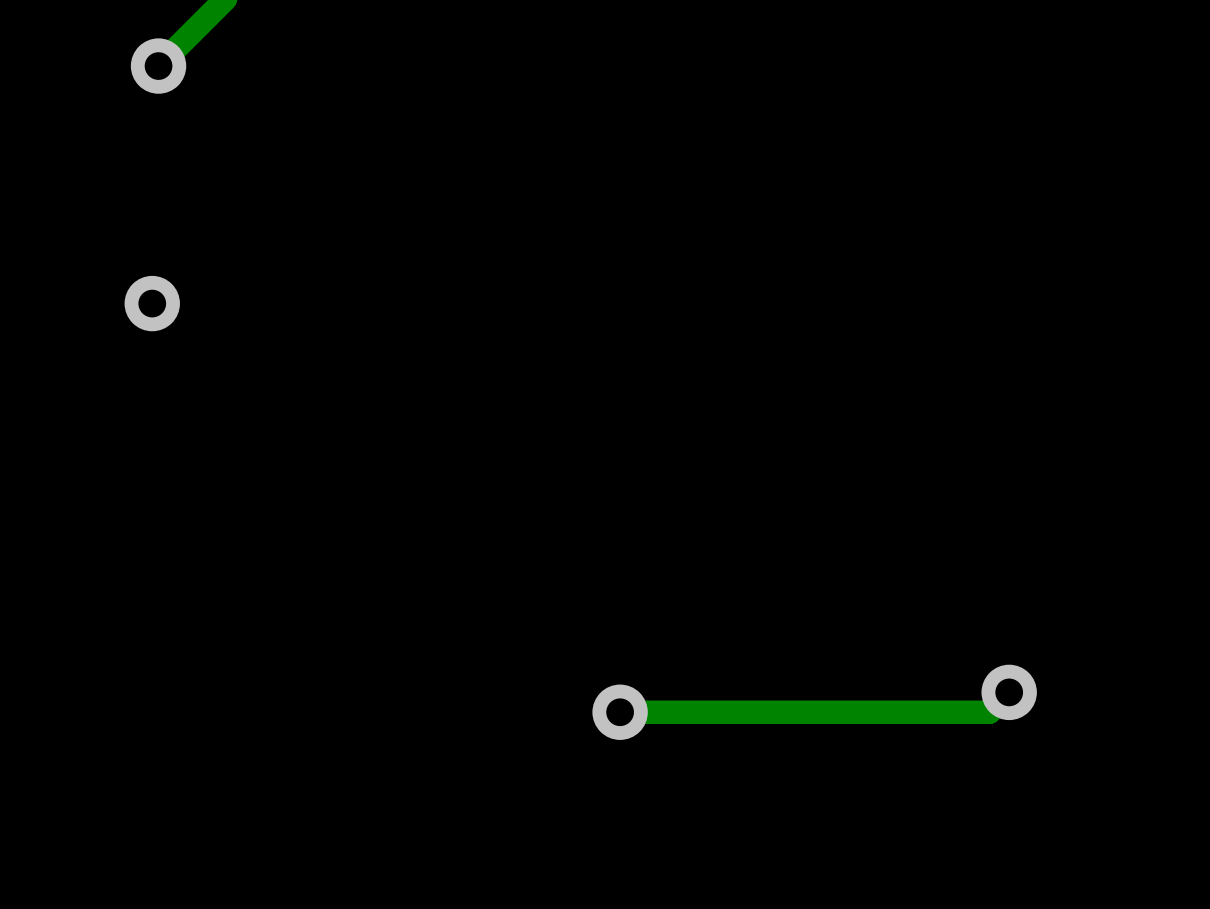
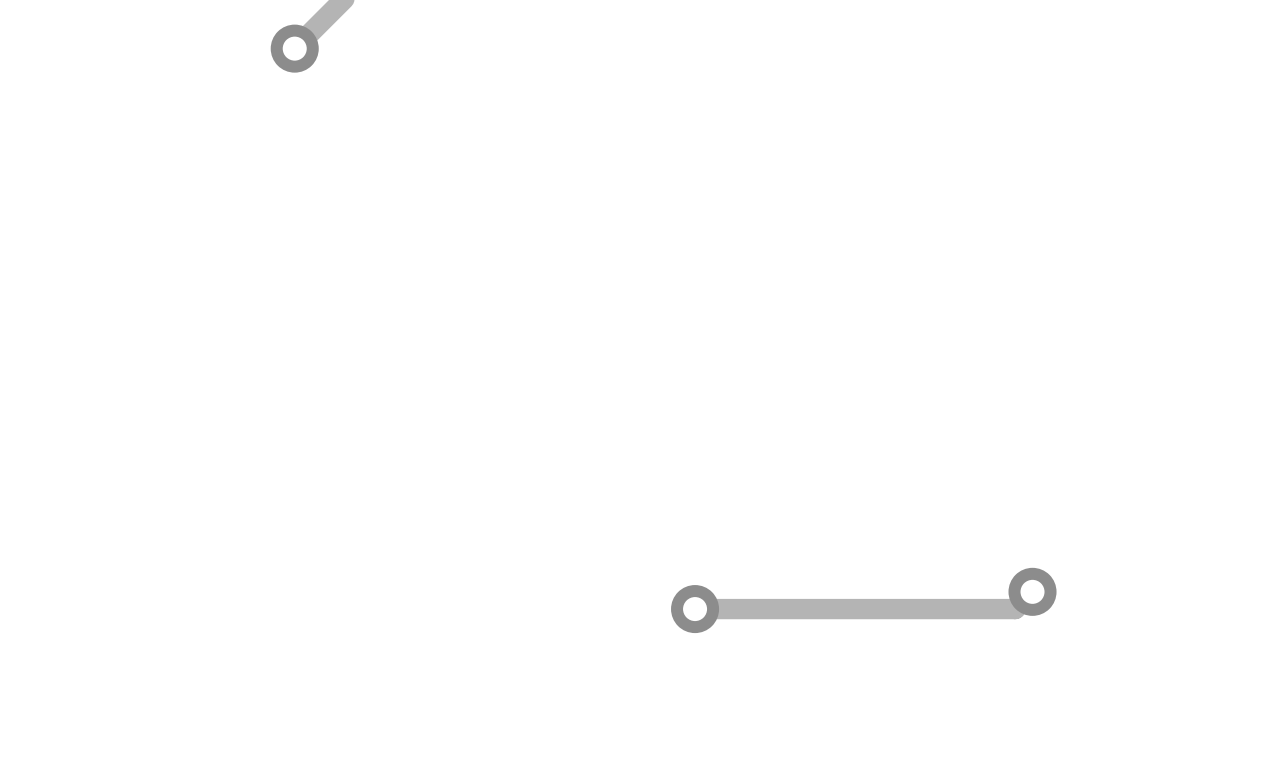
via: (152, 303) -> none

